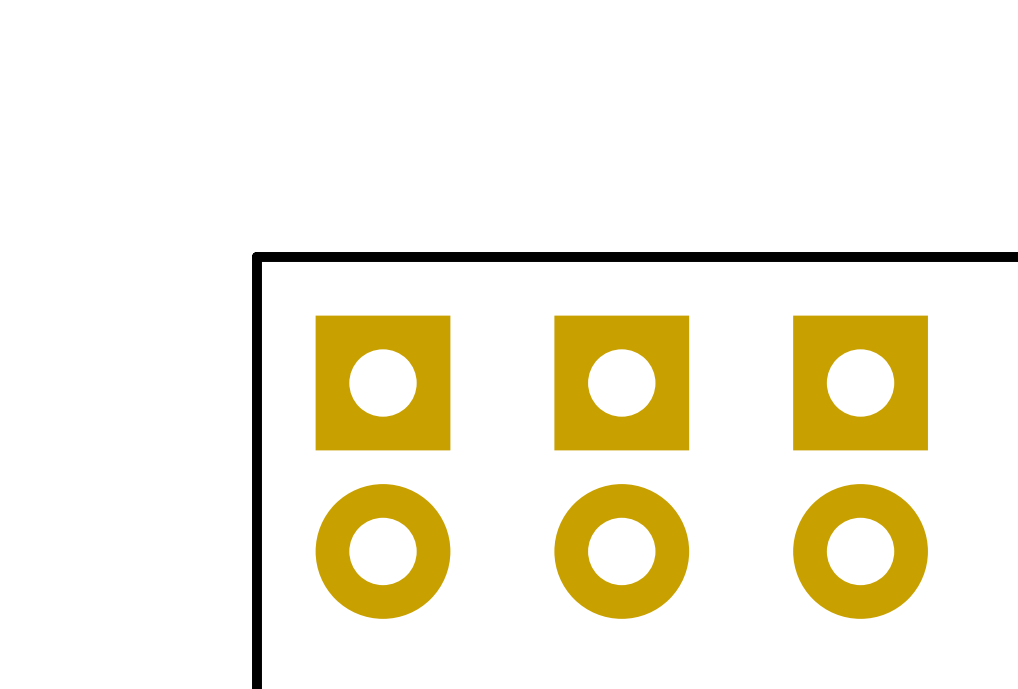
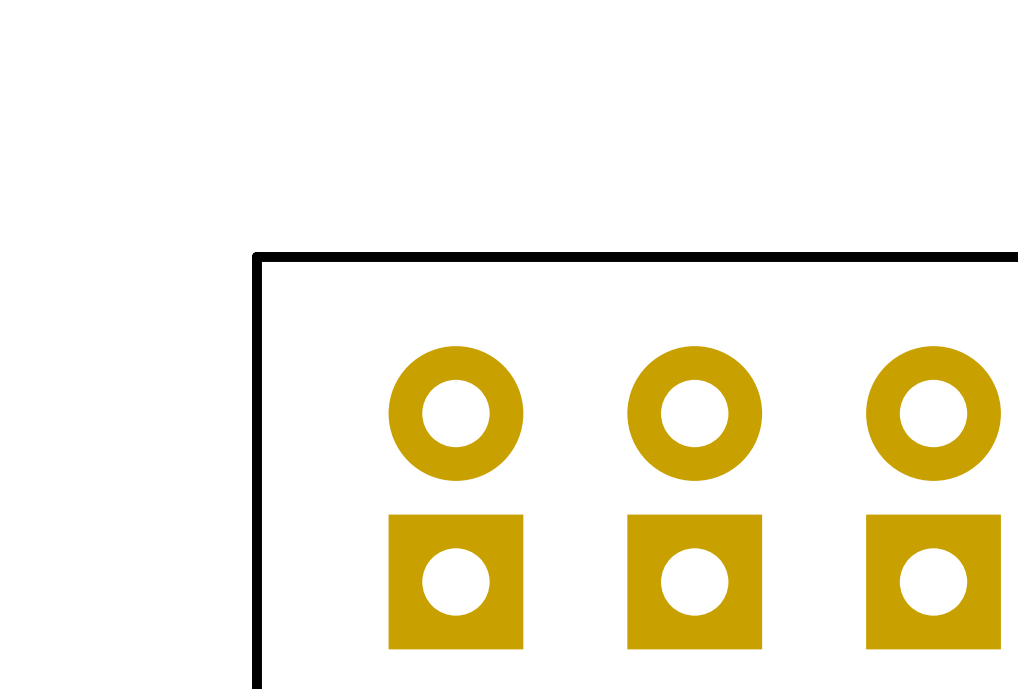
part rotation: 0° (383, 467) -> 180° (455, 497)
part rotation: 0° (621, 467) -> 180° (694, 497)
part rotation: 0° (860, 467) -> 180° (933, 497)

